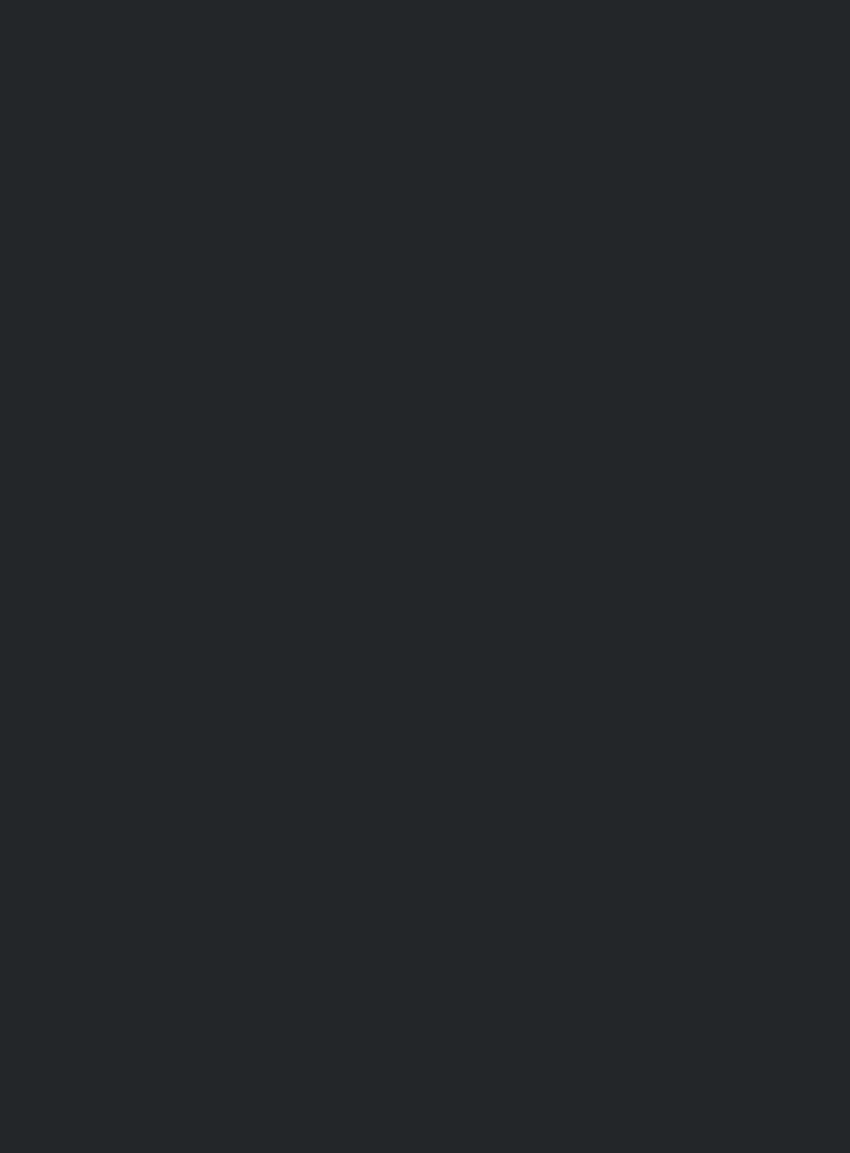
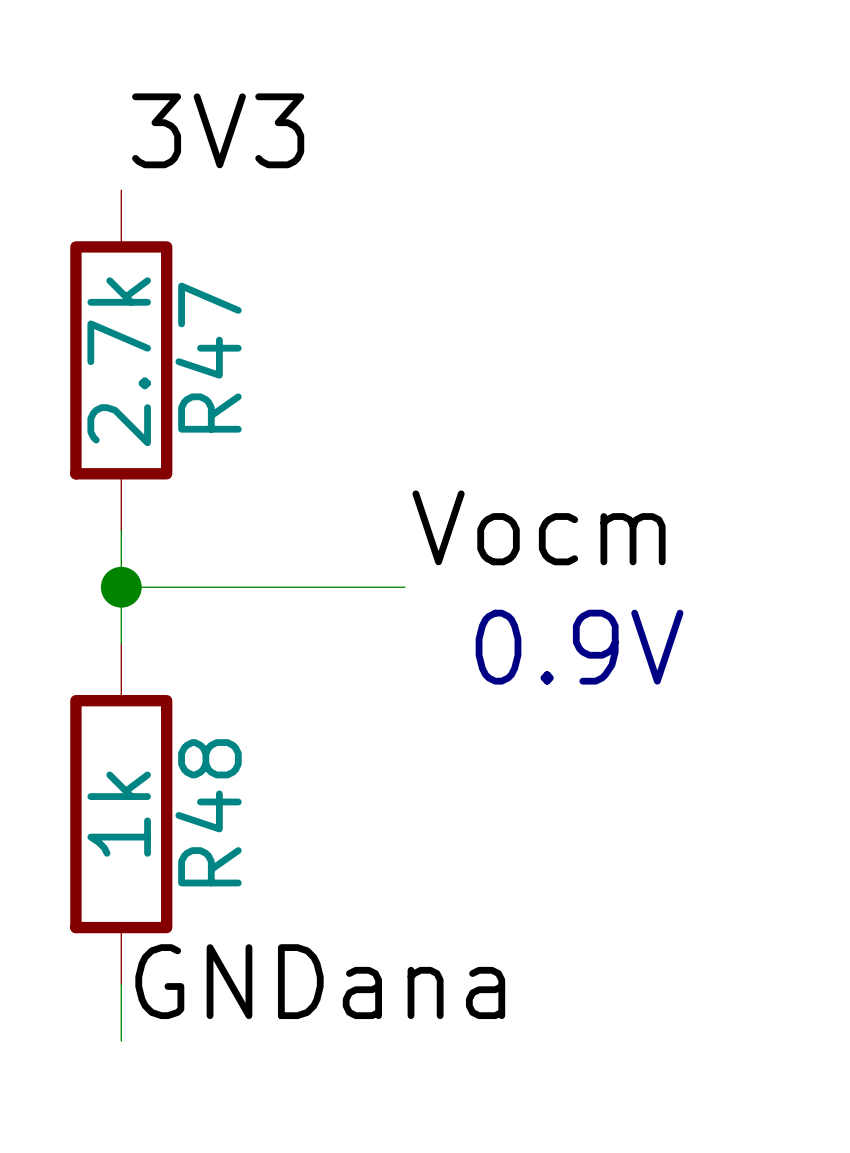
label: none -> 3V3 (218, 130)
R47: none -> 2.7k (121, 360)
label: none -> Vocm (539, 527)
wire: none -> (121, 530) (121, 643)
wire: none -> (121, 587) (404, 587)
junction: none -> (121, 587)
text: none -> 0.9V (579, 647)
R48: none -> 1k (121, 814)
label: none -> GNDana (320, 981)
wire: none -> (121, 984) (121, 1041)

